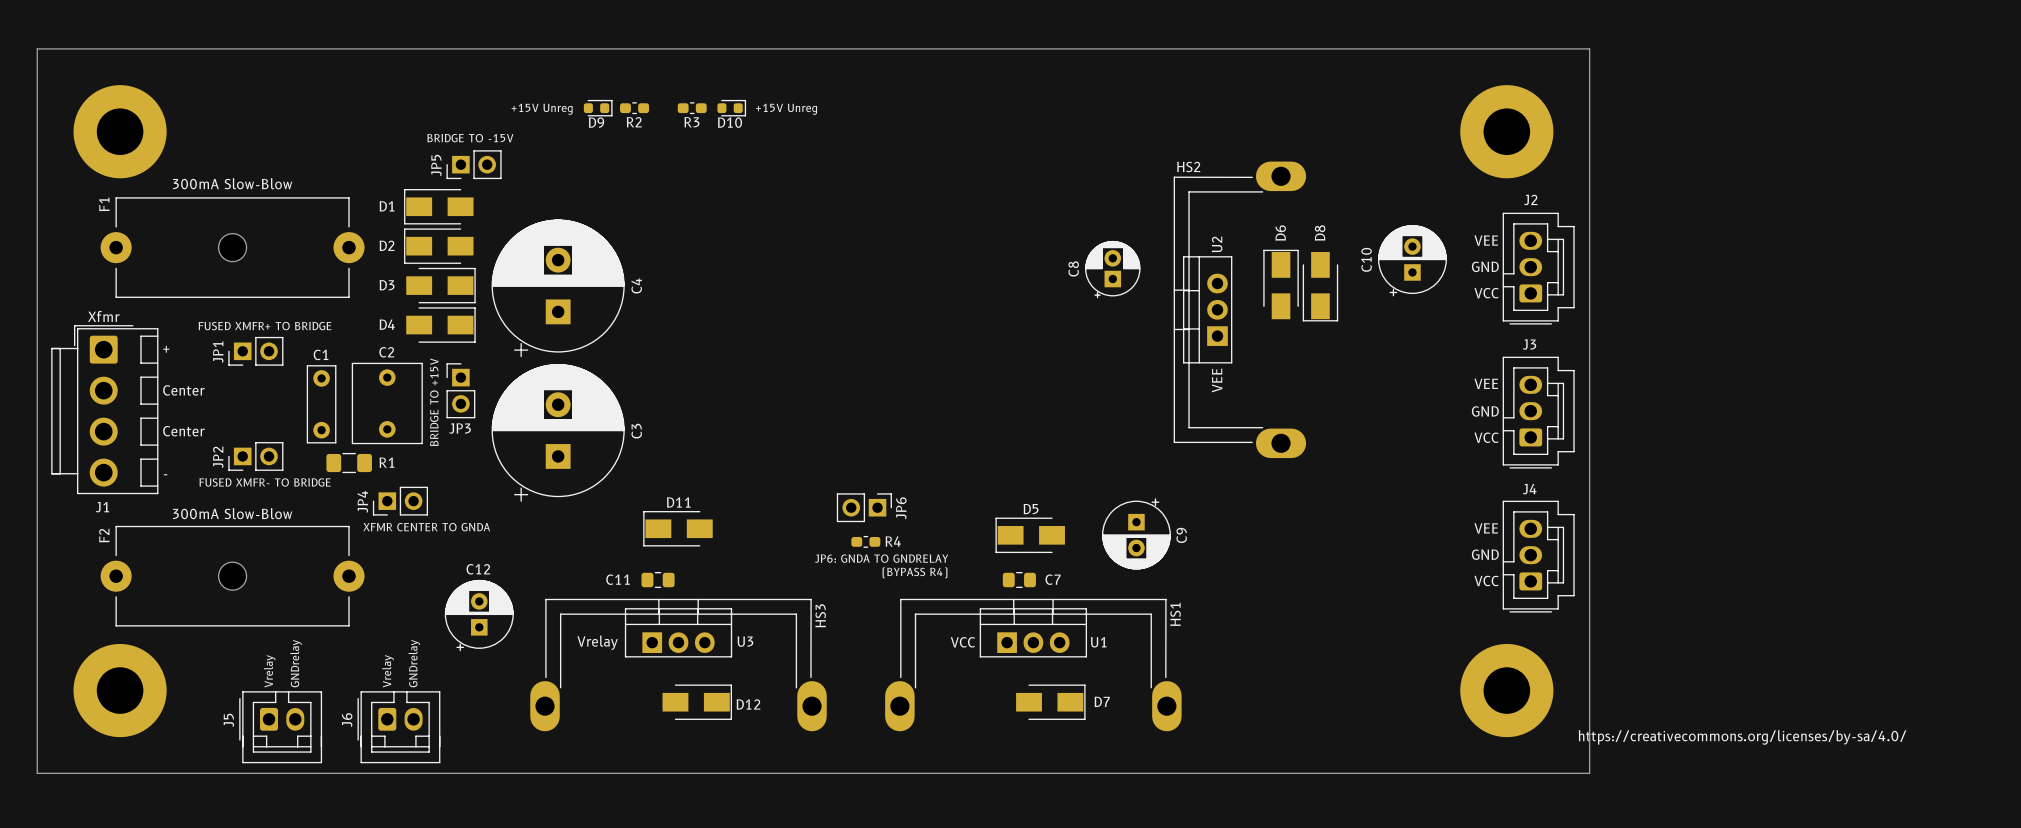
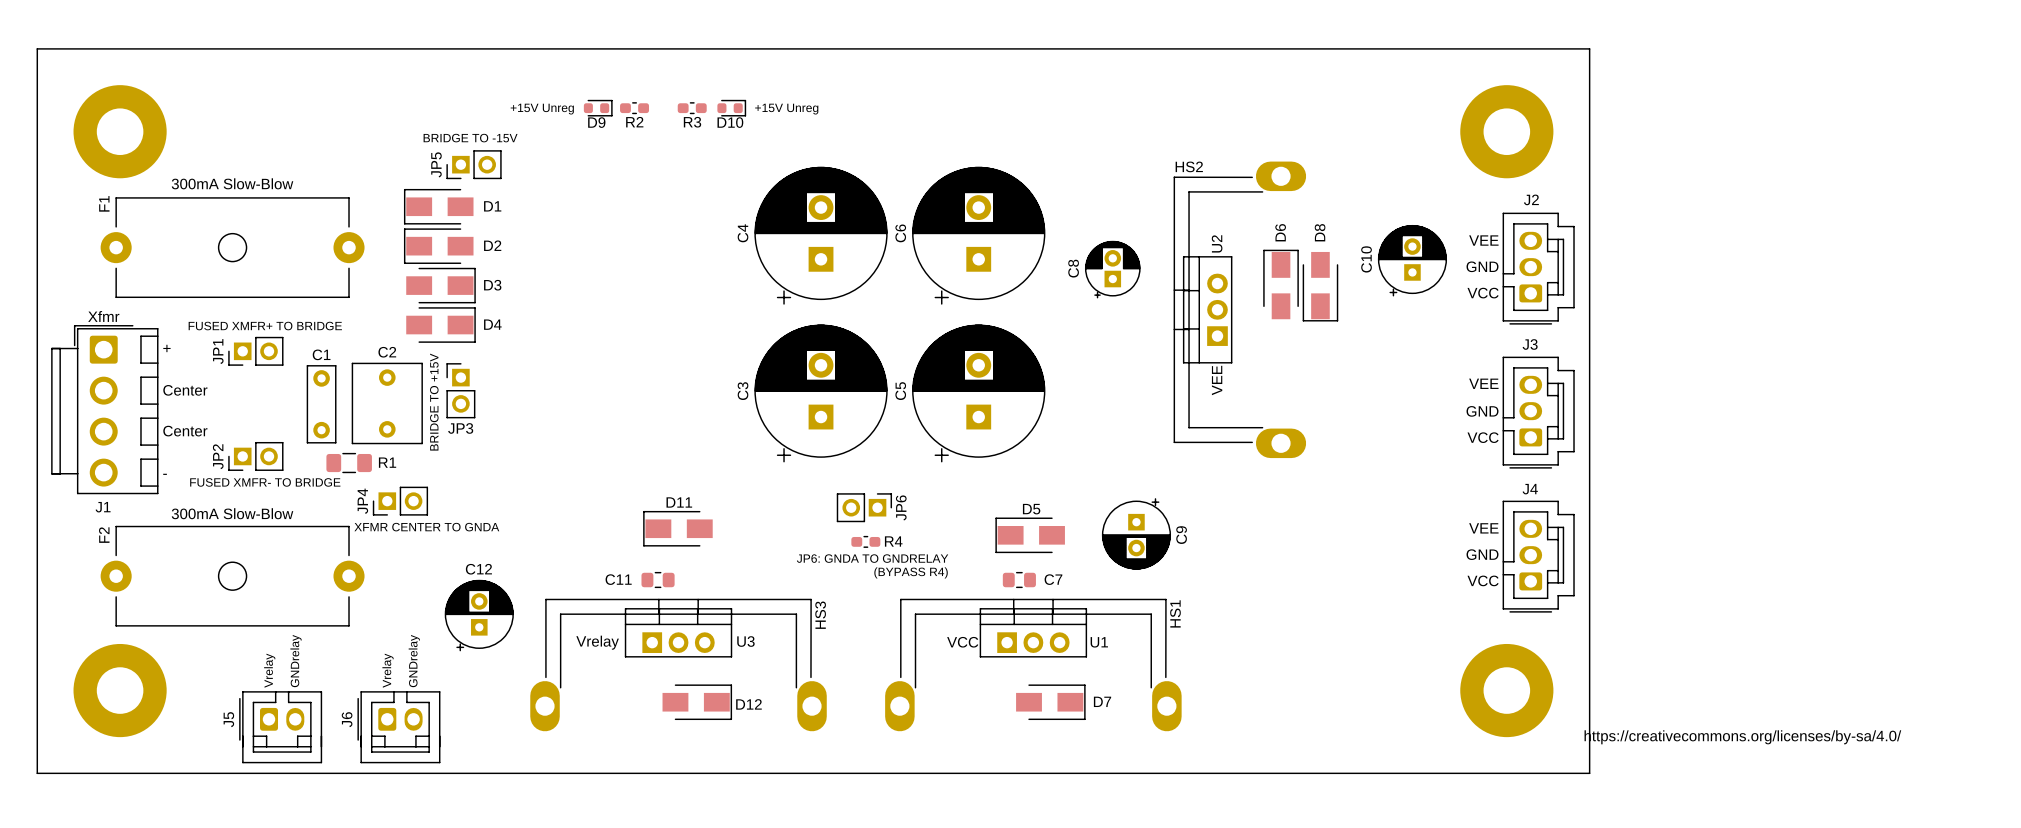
D1 name position: D1 (387, 206) -> D1 (492, 206)
C6: none -> (978, 235)
D2 name position: D2 (387, 245) -> D2 (492, 245)
D3 name position: D3 (387, 285) -> D3 (492, 285)
C4 name position: C4 (636, 285) -> C4 (743, 233)
C4 position: (558, 288) -> (821, 235)
D4 name position: D4 (387, 324) -> D4 (492, 324)
C5: none -> (978, 393)
C3 name position: C3 (636, 431) -> C3 (743, 391)
C3 position: (558, 432) -> (821, 393)

